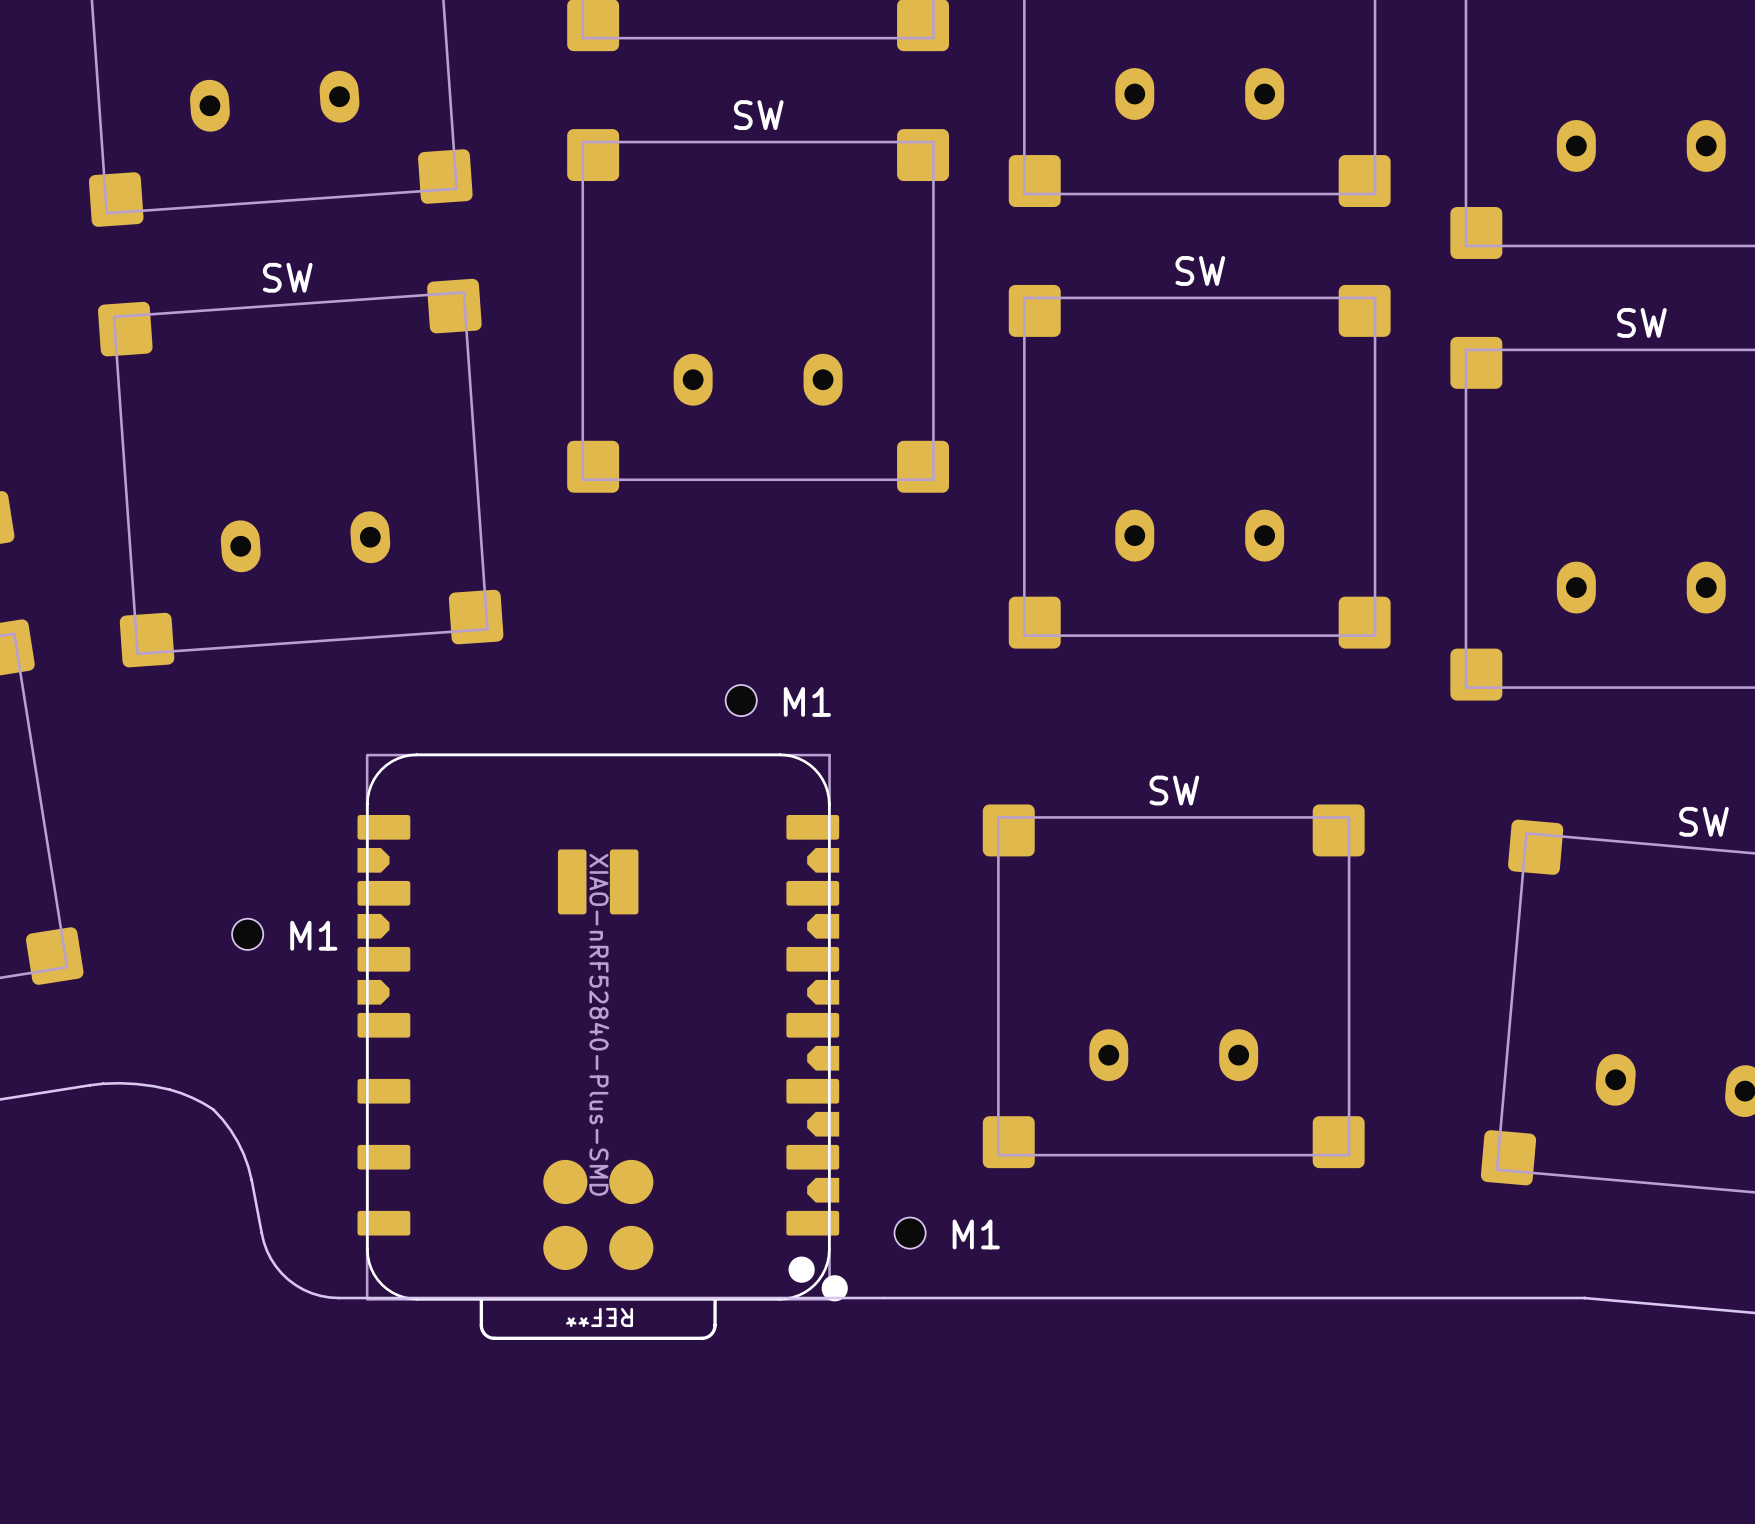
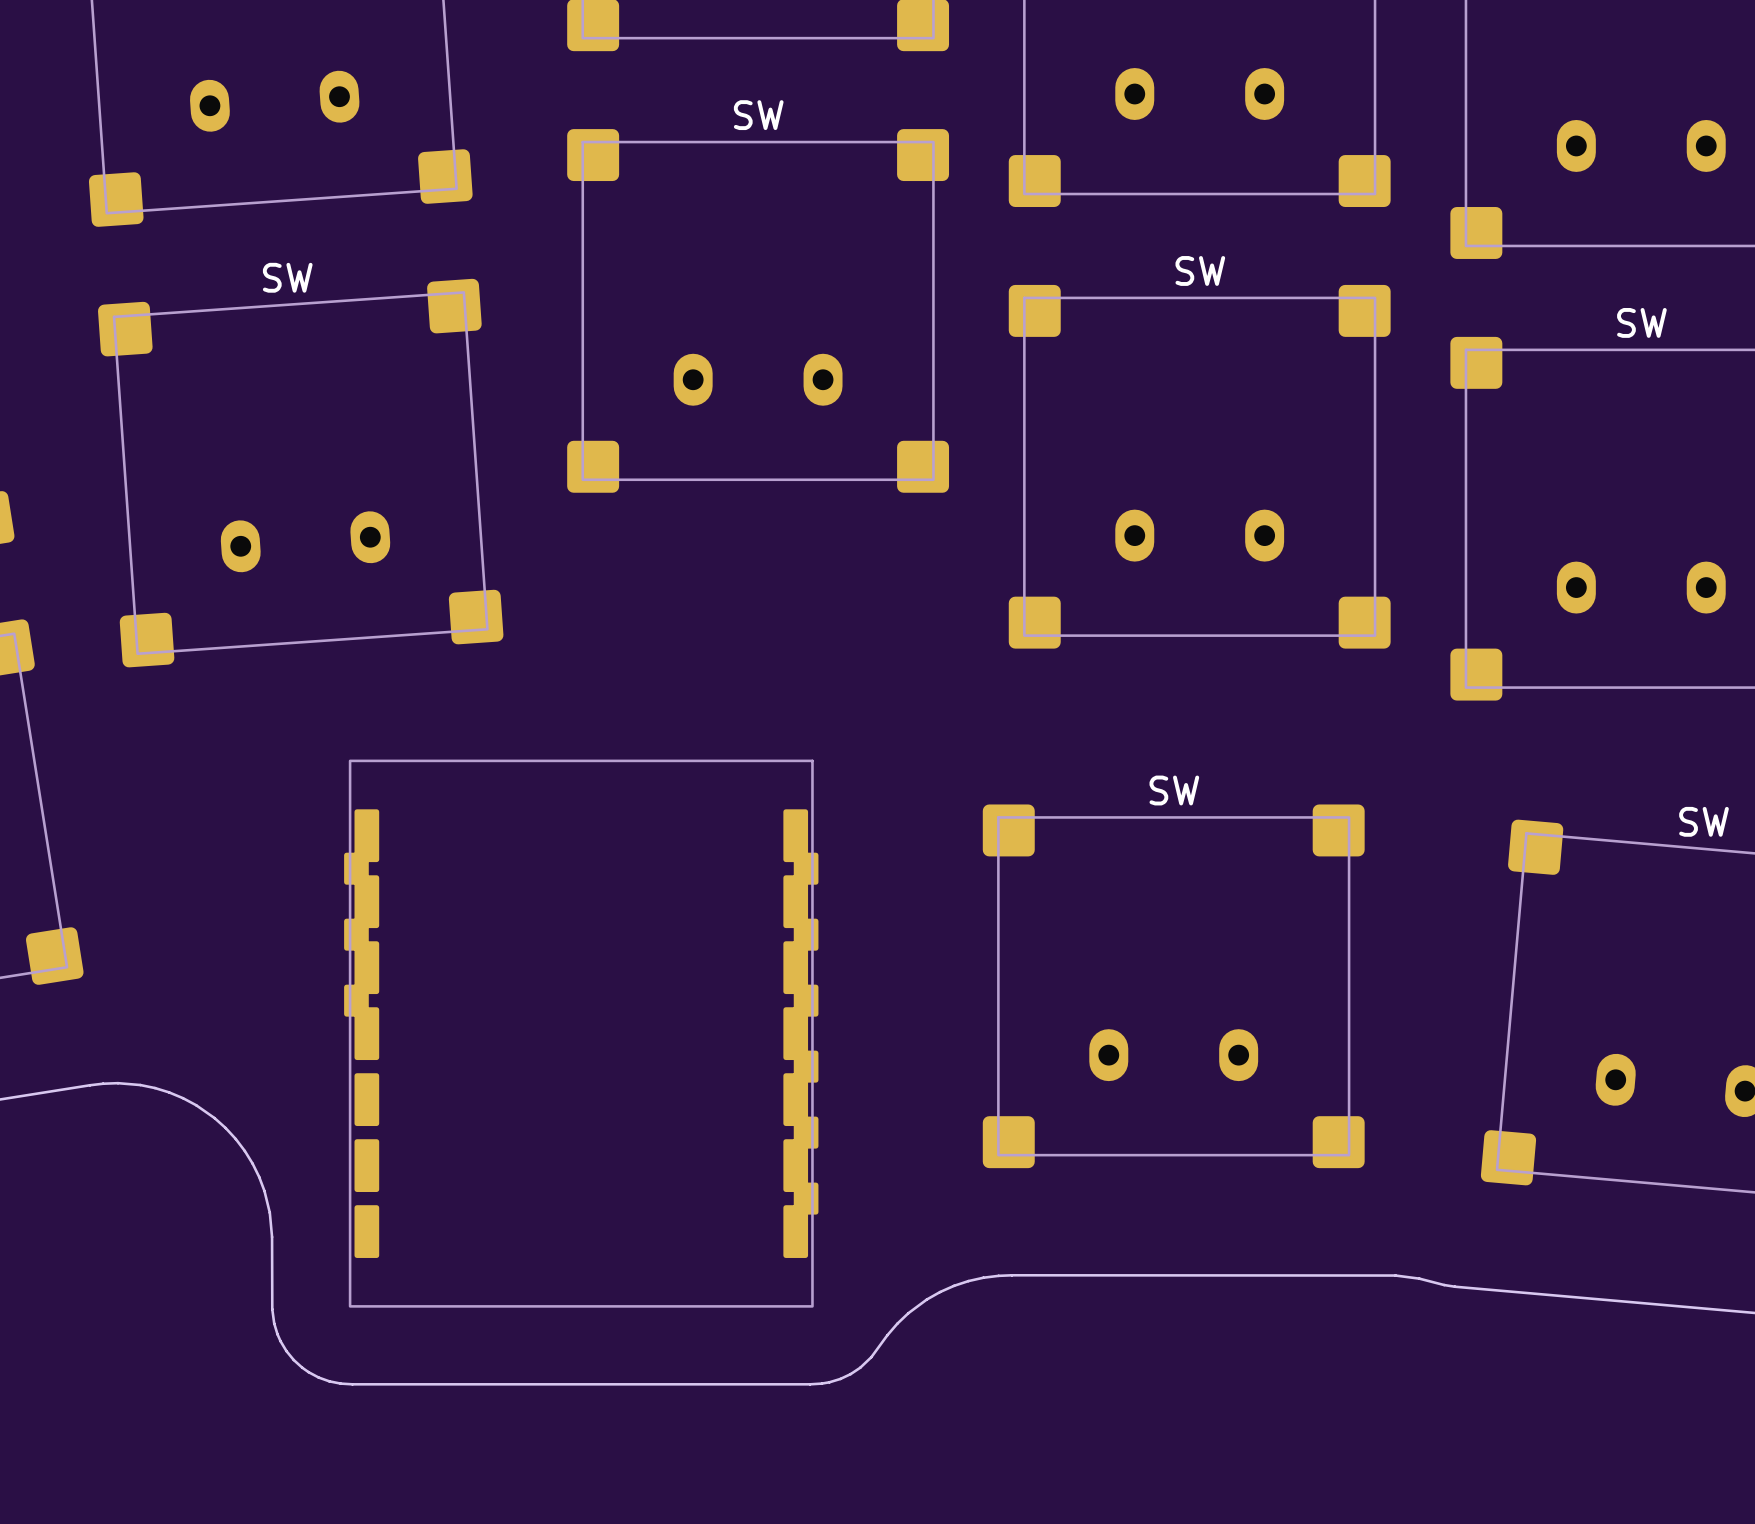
M1: (741, 700) -> none
M1: (247, 934) -> none
part: none -> (581, 1033)
REF**: XIAO-nRF52840-Plus-SMD (602, 1046) -> none
board edge: (103, 1083) (136, 1084) (169, 1089) (192, 1097) (213, 1109) (230, 1130) (243, 1154) (251, 1180) (263, 1241) (270, 1258) (281, 1273) (295, 1285) (311, 1293) (329, 1297) (1585, 1298) -> (103, 1083) (140, 1085) (183, 1098) (214, 1118) (235, 1139) (259, 1177) (269, 1212) (272, 1237) (272, 1309) (277, 1334) (286, 1351) (302, 1367) (318, 1377) (340, 1383) (821, 1383) (840, 1378) (860, 1367) (871, 1357) (897, 1323) (926, 1299) (968, 1281) (998, 1275) (1395, 1275) (1454, 1286) (1584, 1298)
M1: (910, 1233) -> none

